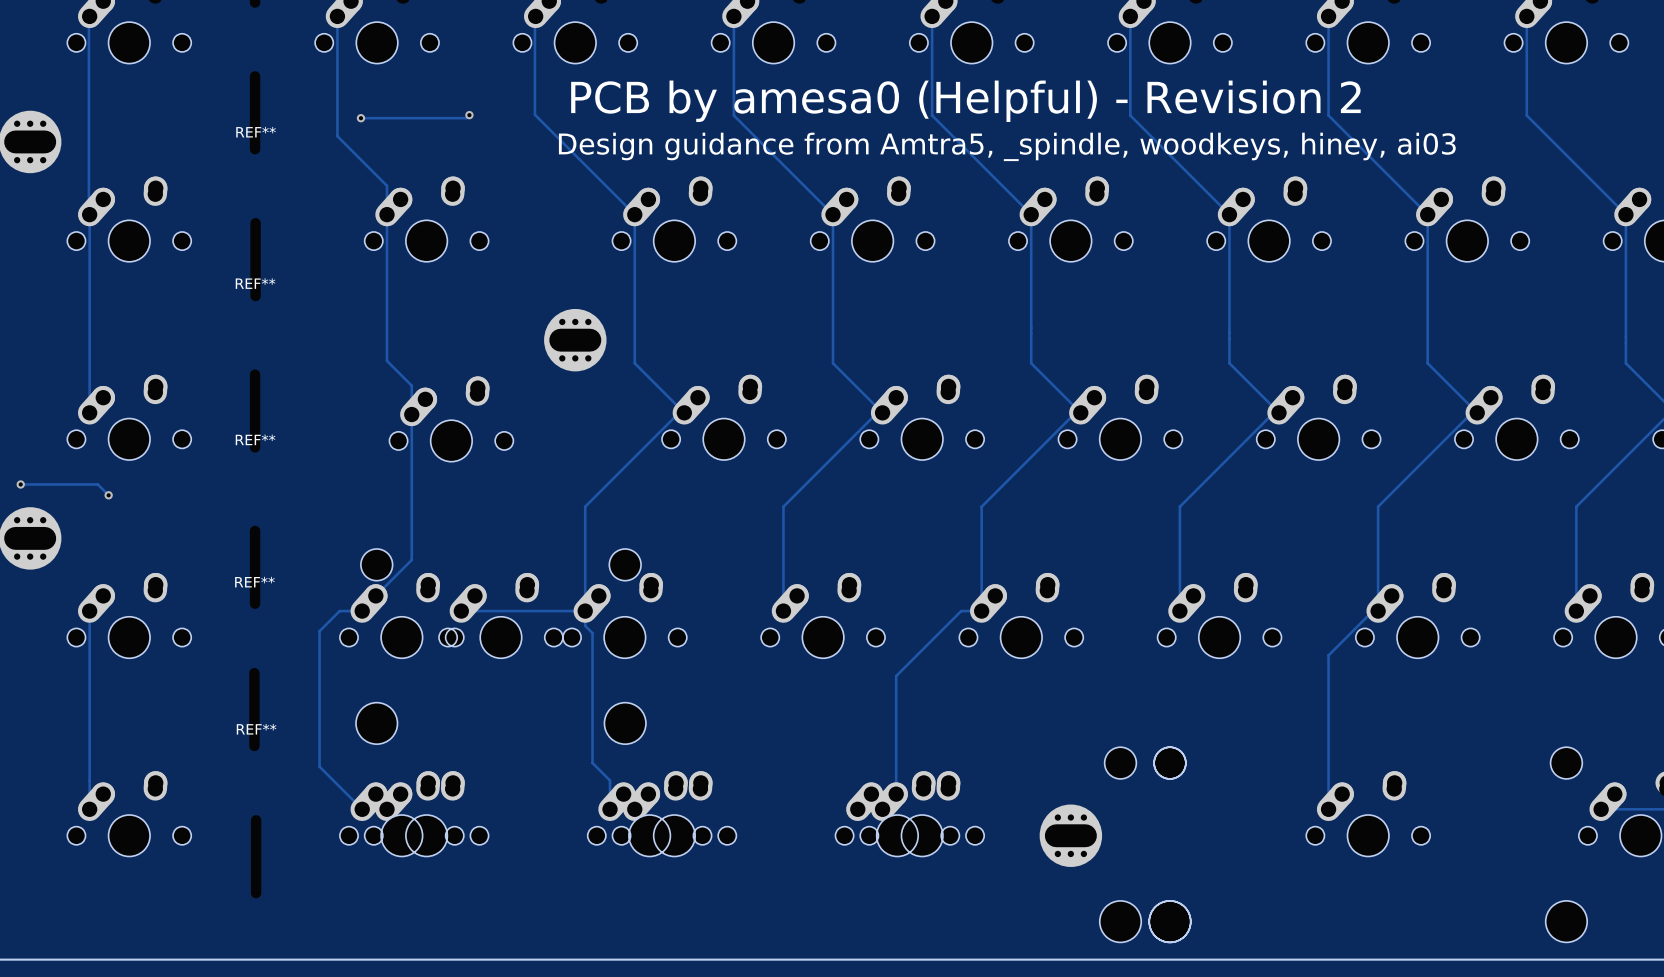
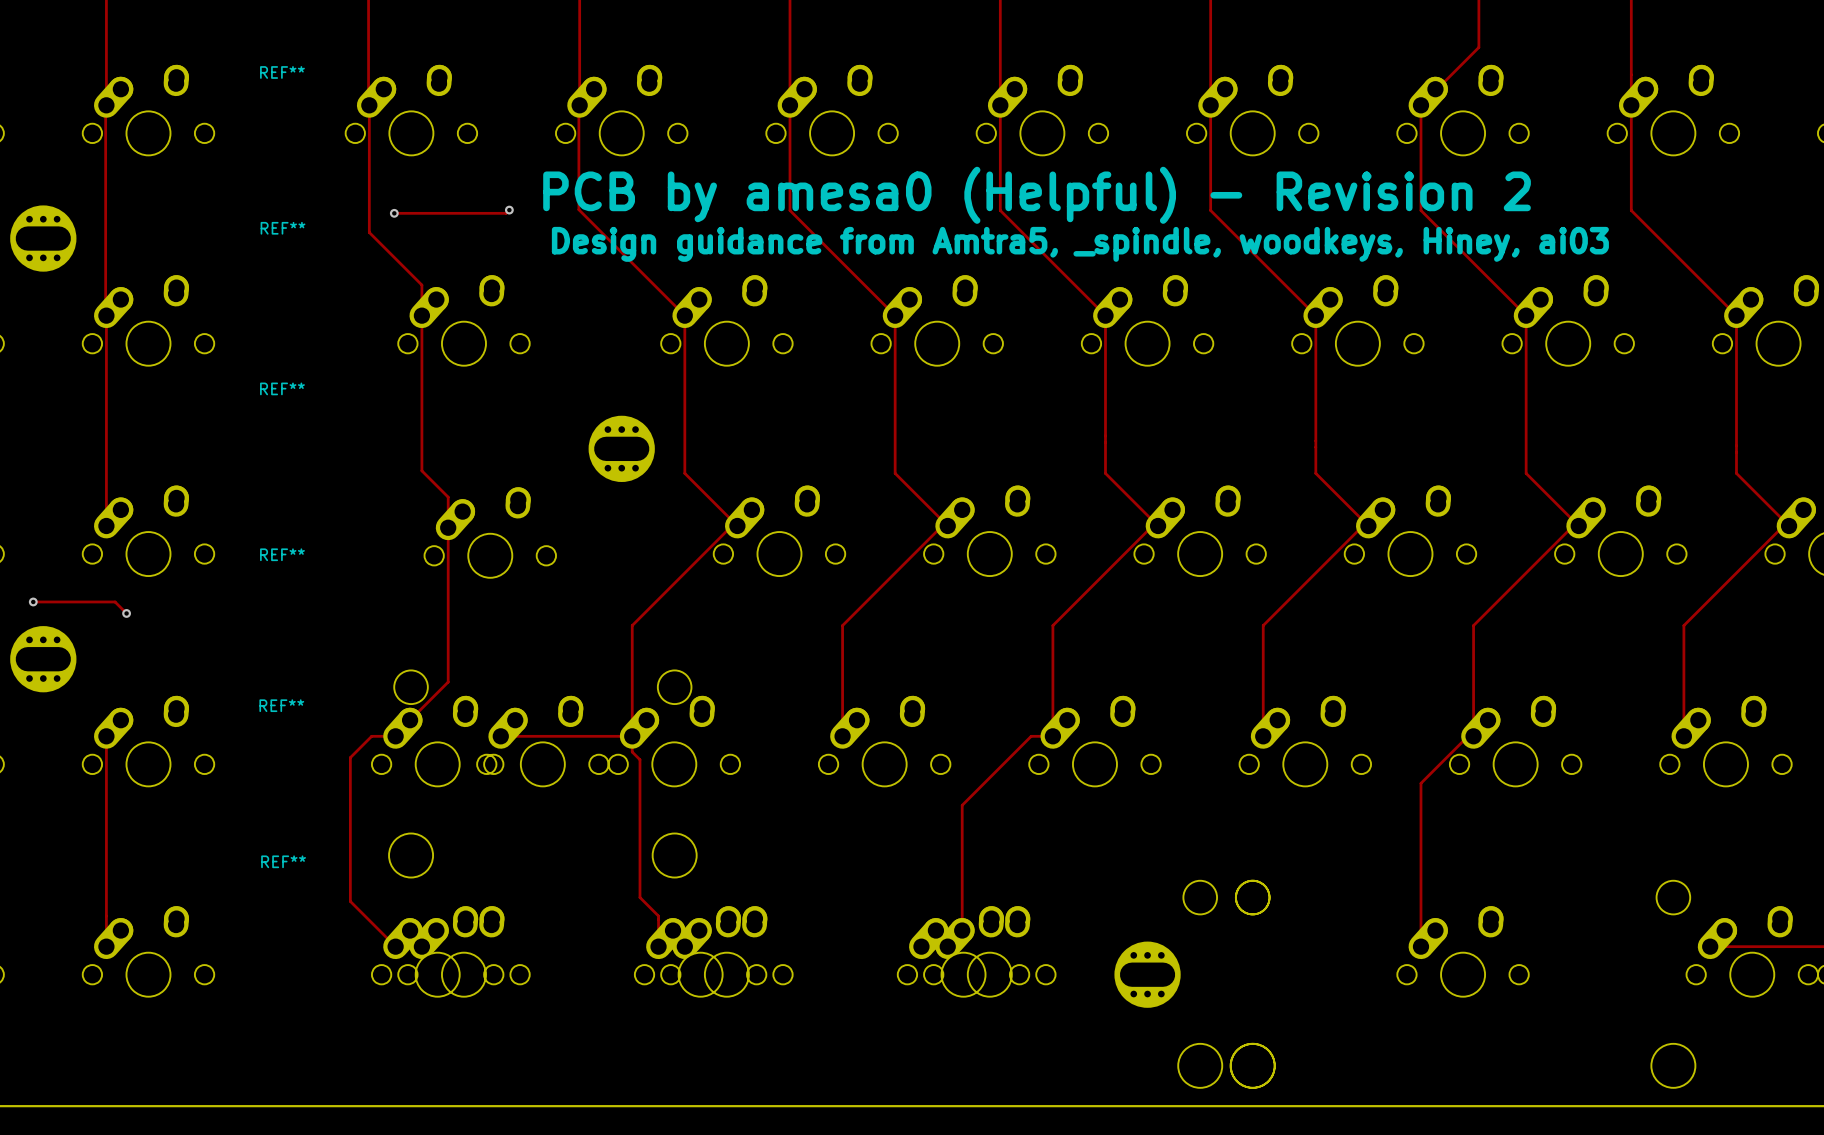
text: Design guidance from Amtra5, _spindle, woodkeys, hiney, ai03 (1007, 146) -> Design guidance from Amtra5, _spindle, woodkeys, Hiney, ai03 (1080, 244)

